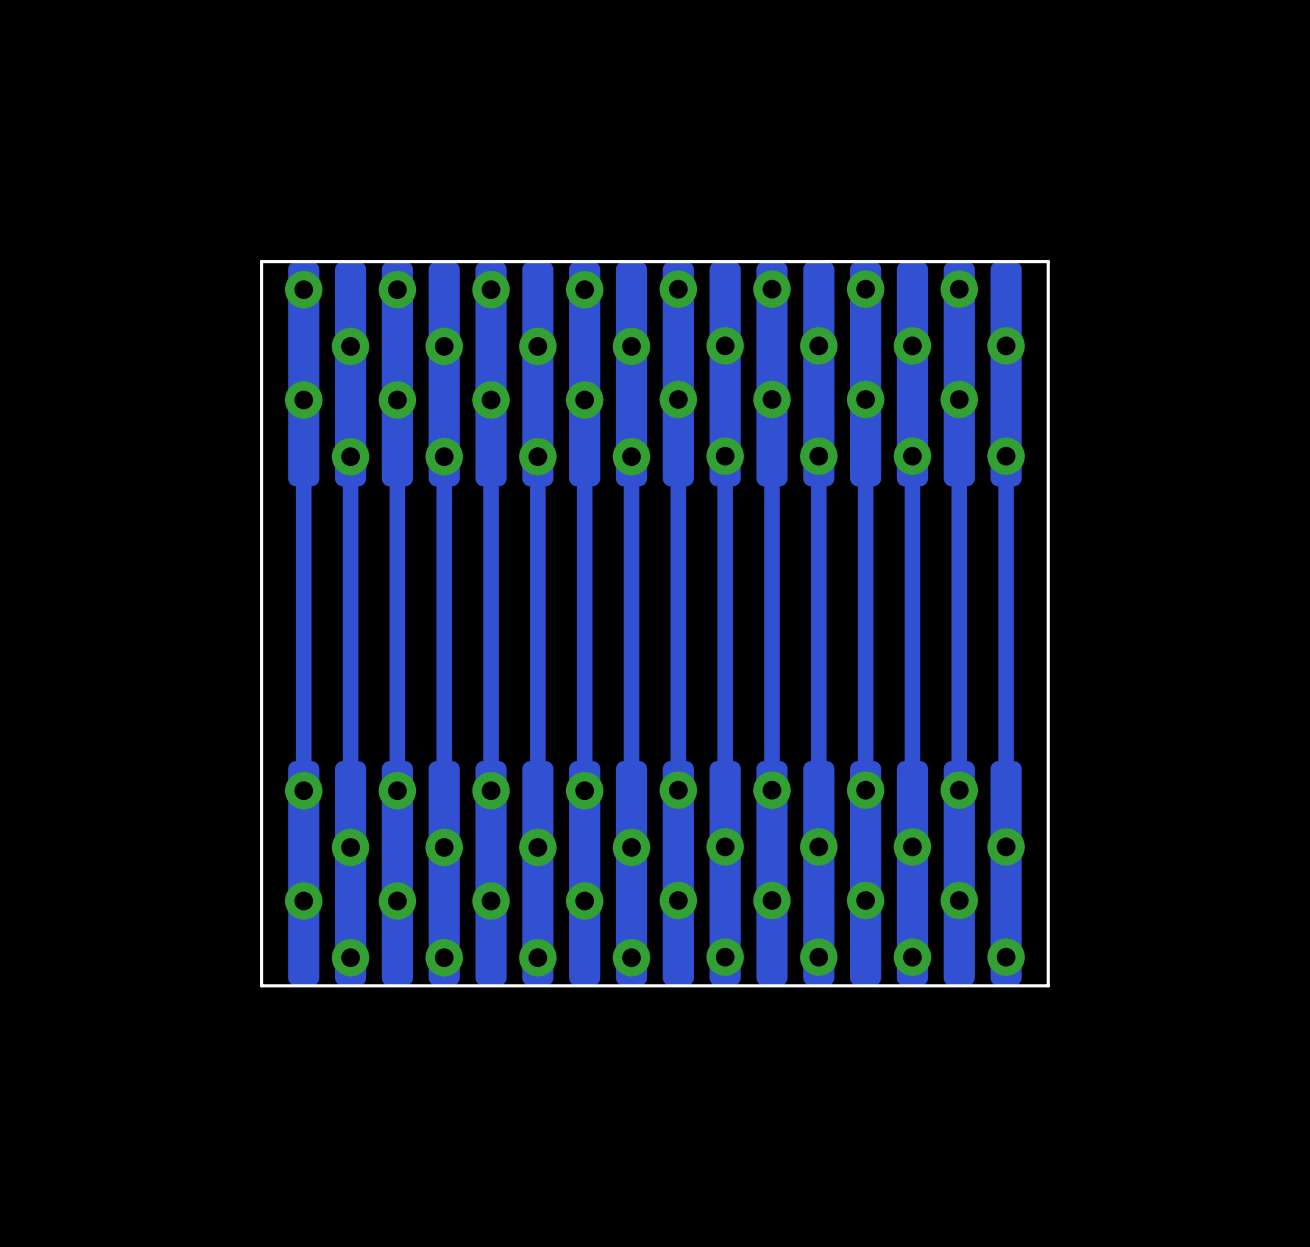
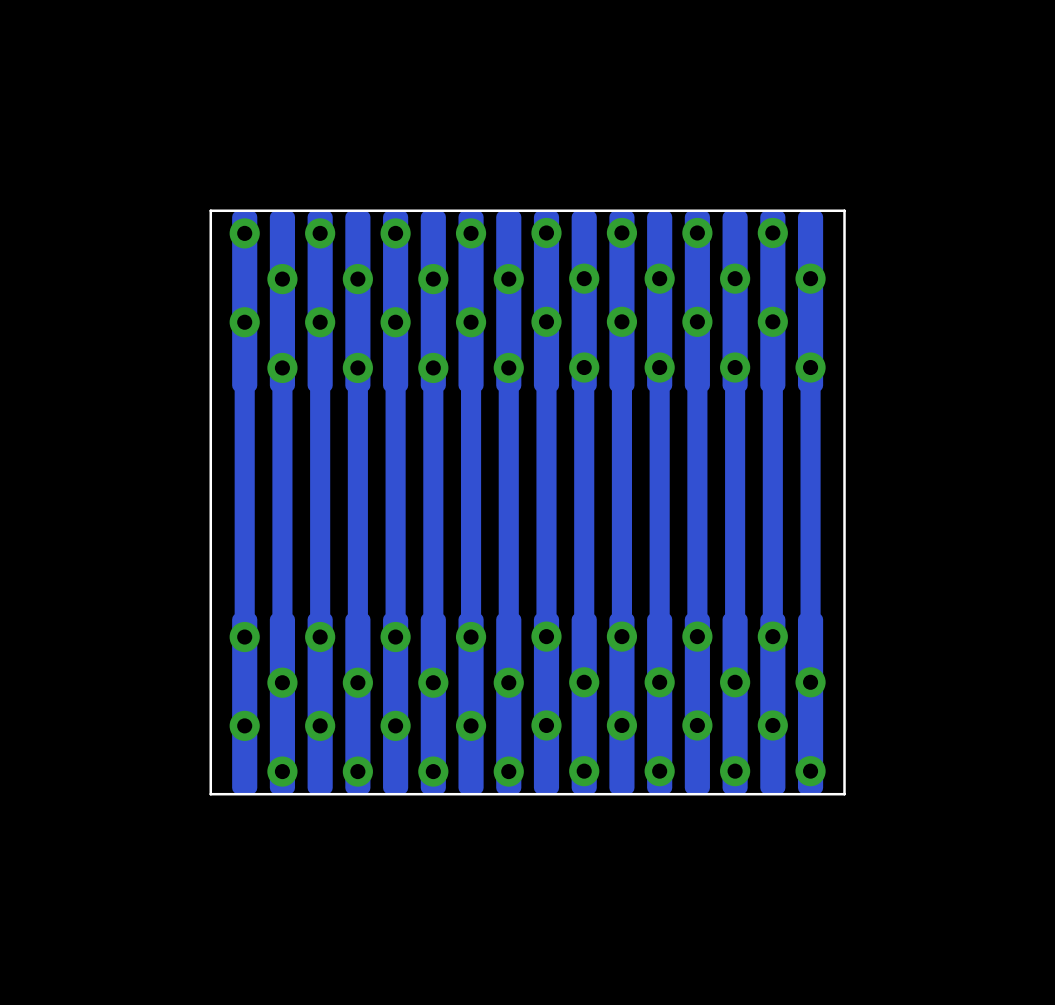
track width: thin (303, 373) (303, 873) -> thick (244, 301) (244, 703)
track width: thin (350, 373) (350, 873) -> thick (282, 301) (282, 703)
track width: thin (397, 373) (397, 873) -> thick (320, 301) (320, 703)
track width: thin (444, 373) (444, 873) -> thick (357, 301) (357, 703)
track width: thin (491, 373) (491, 873) -> thick (395, 301) (395, 703)
track width: thin (537, 373) (537, 873) -> thick (433, 301) (433, 703)
track width: thin (584, 373) (584, 873) -> thick (471, 301) (471, 703)
track width: thin (631, 373) (631, 873) -> thick (508, 301) (508, 703)
track width: thin (678, 373) (678, 873) -> thick (546, 301) (546, 703)
track width: thin (725, 373) (725, 873) -> thick (584, 301) (584, 703)
track width: thin (771, 373) (771, 873) -> thick (621, 301) (621, 703)
track width: thin (818, 373) (818, 873) -> thick (659, 301) (659, 703)
track width: thin (865, 373) (865, 873) -> thick (697, 301) (697, 703)
track width: thin (912, 373) (912, 873) -> thick (735, 301) (735, 703)
track width: thin (959, 373) (959, 873) -> thick (772, 301) (772, 703)
track width: thin (1006, 373) (1006, 873) -> thick (810, 301) (810, 703)

